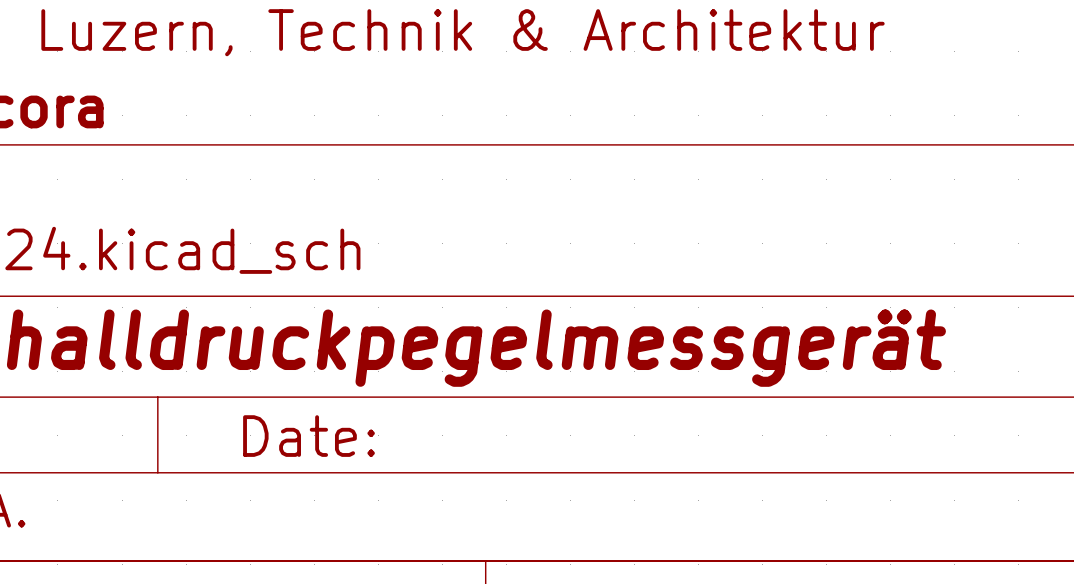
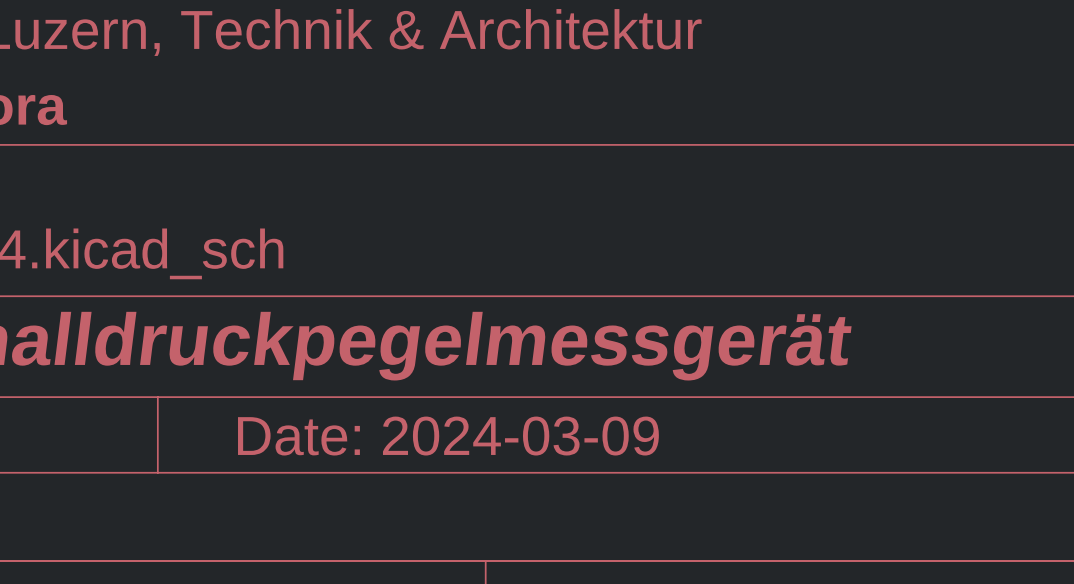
title block: Date: (308, 436) -> Date: 2024-03-09 (448, 436)

